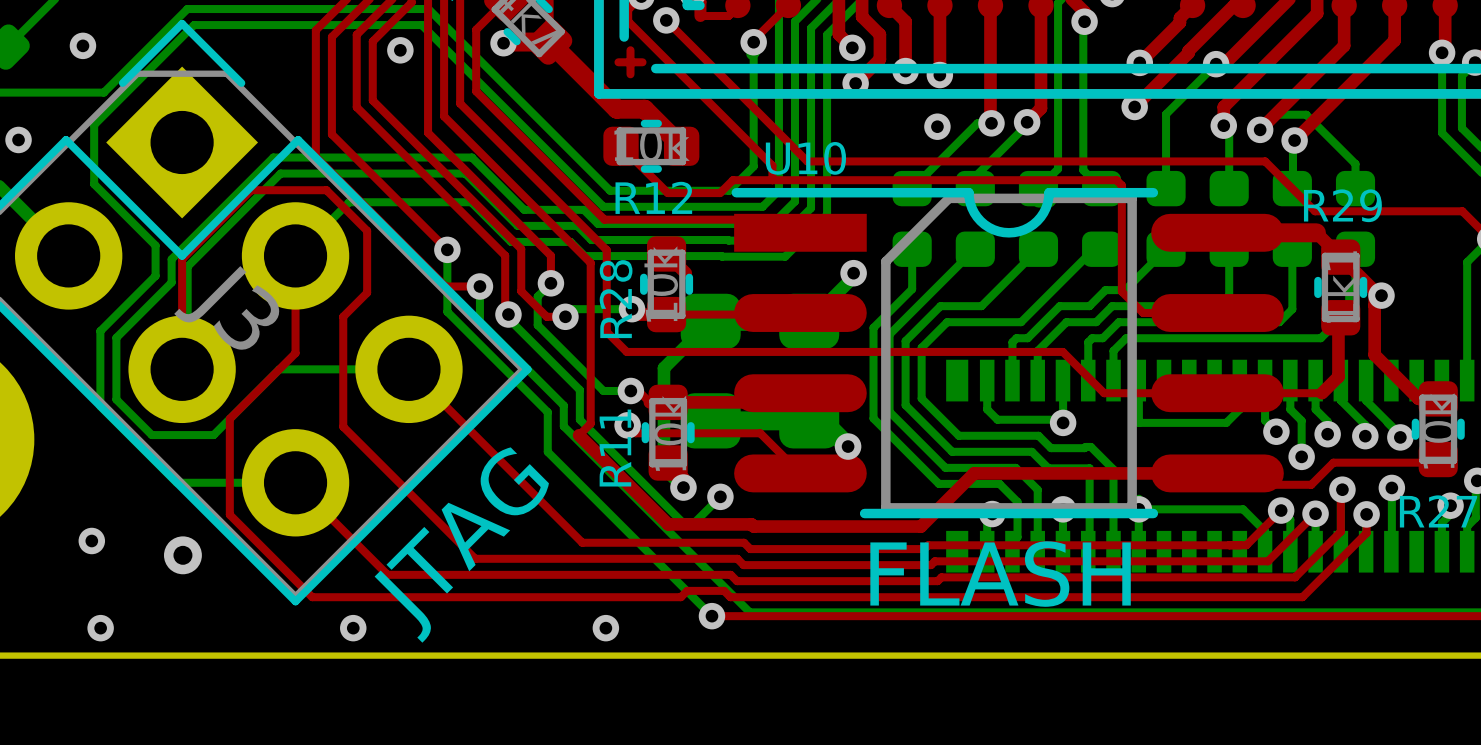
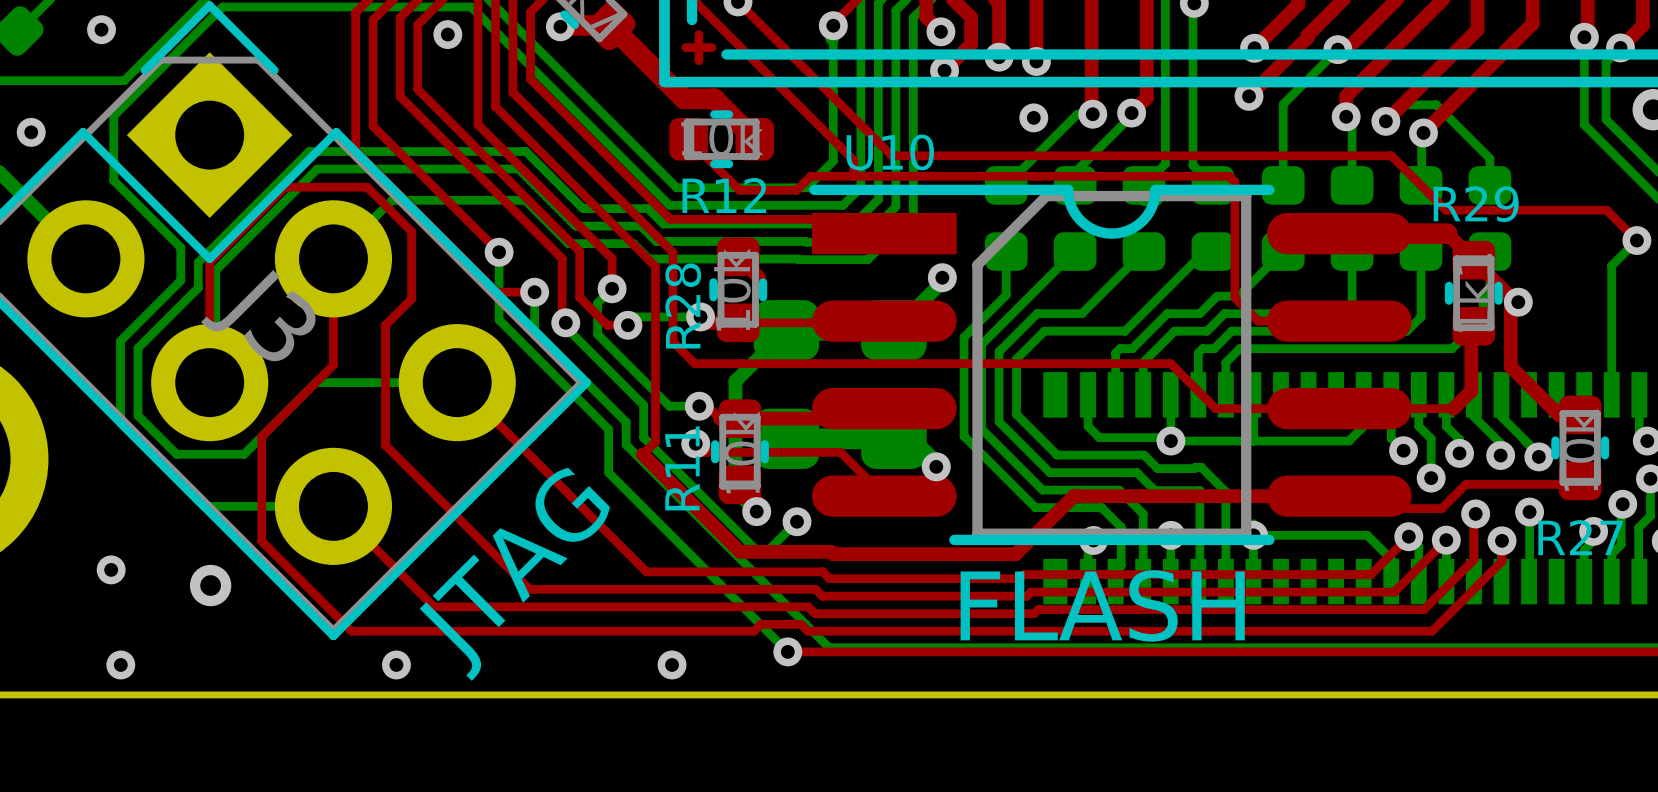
bottom track: none -> (1170, 441) (1253, 441)

